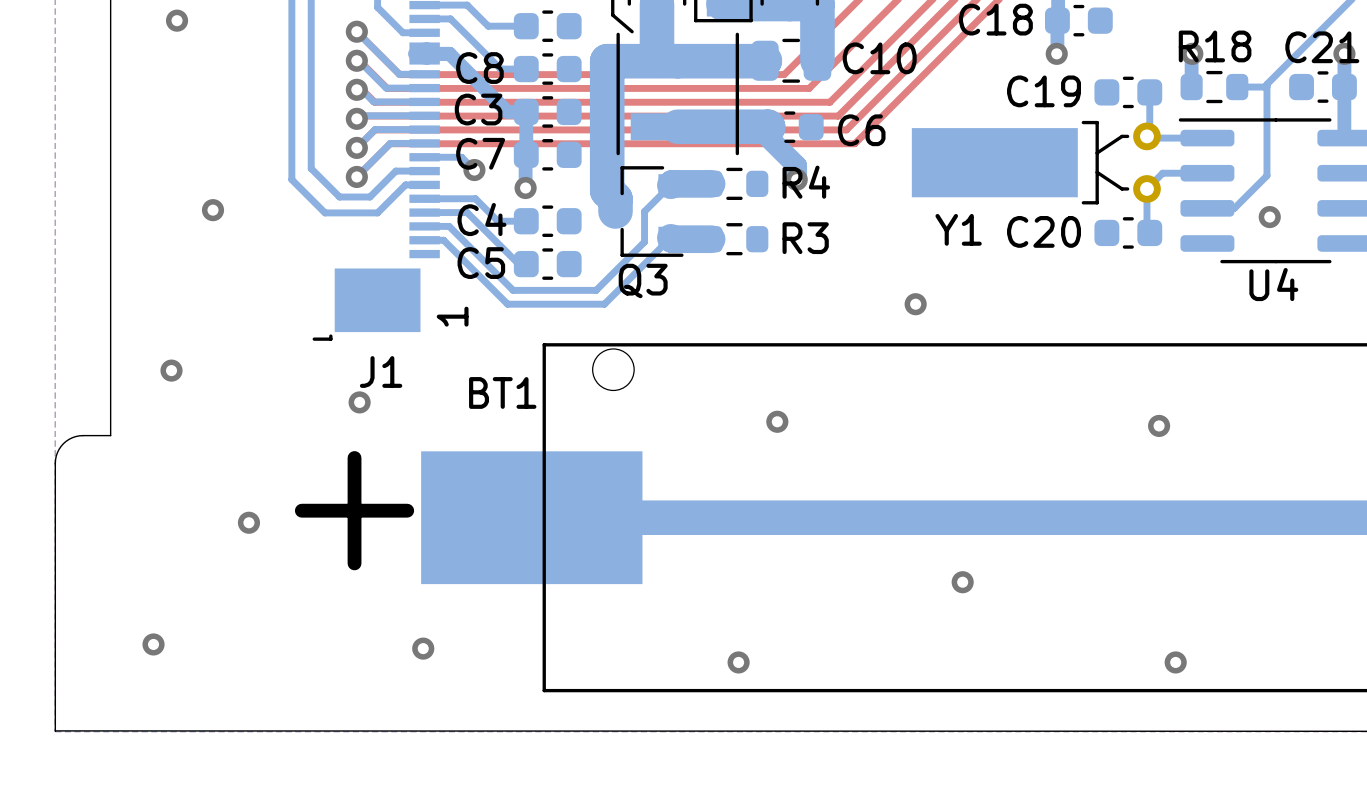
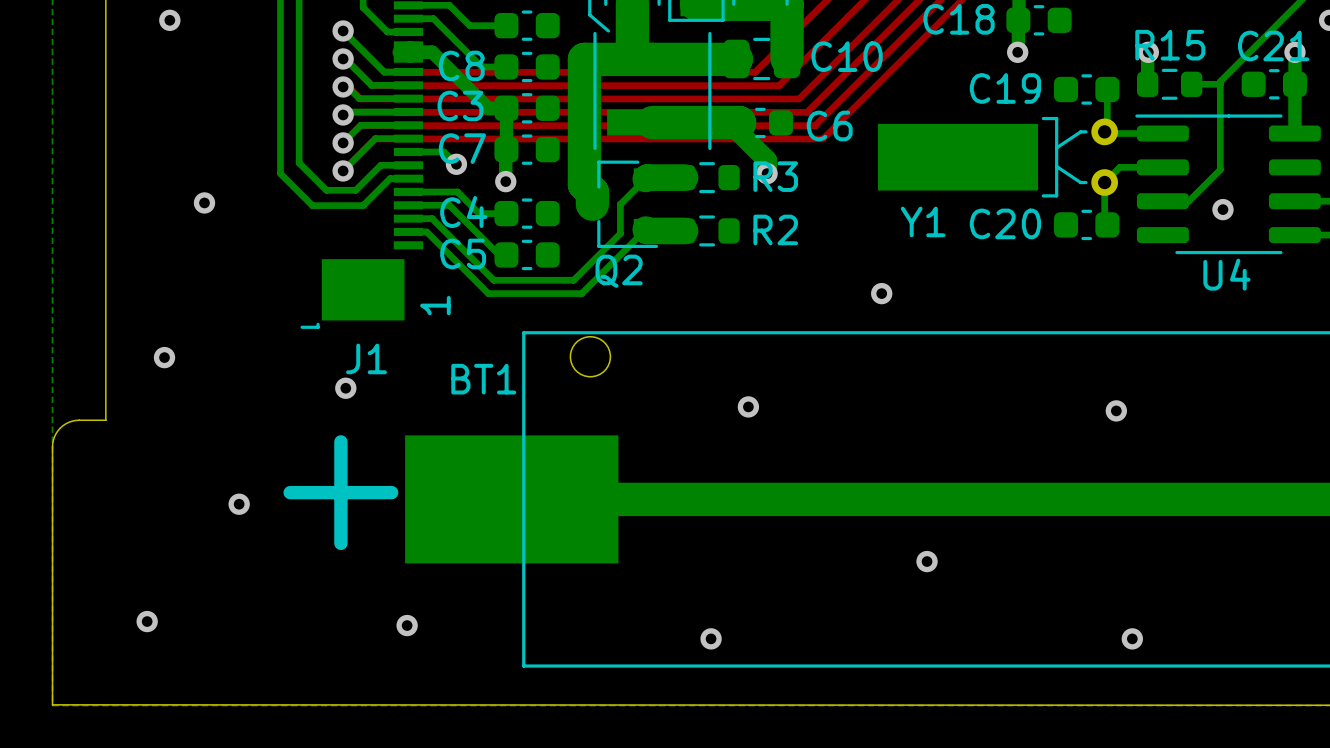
R18 name: R18 (1215, 46) -> R15 (1170, 45)
R4 name: R4 (806, 182) -> R3 (775, 176)
R3 name: R3 (805, 238) -> R2 (775, 229)
Q3 name: Q3 (643, 280) -> Q2 (619, 271)

